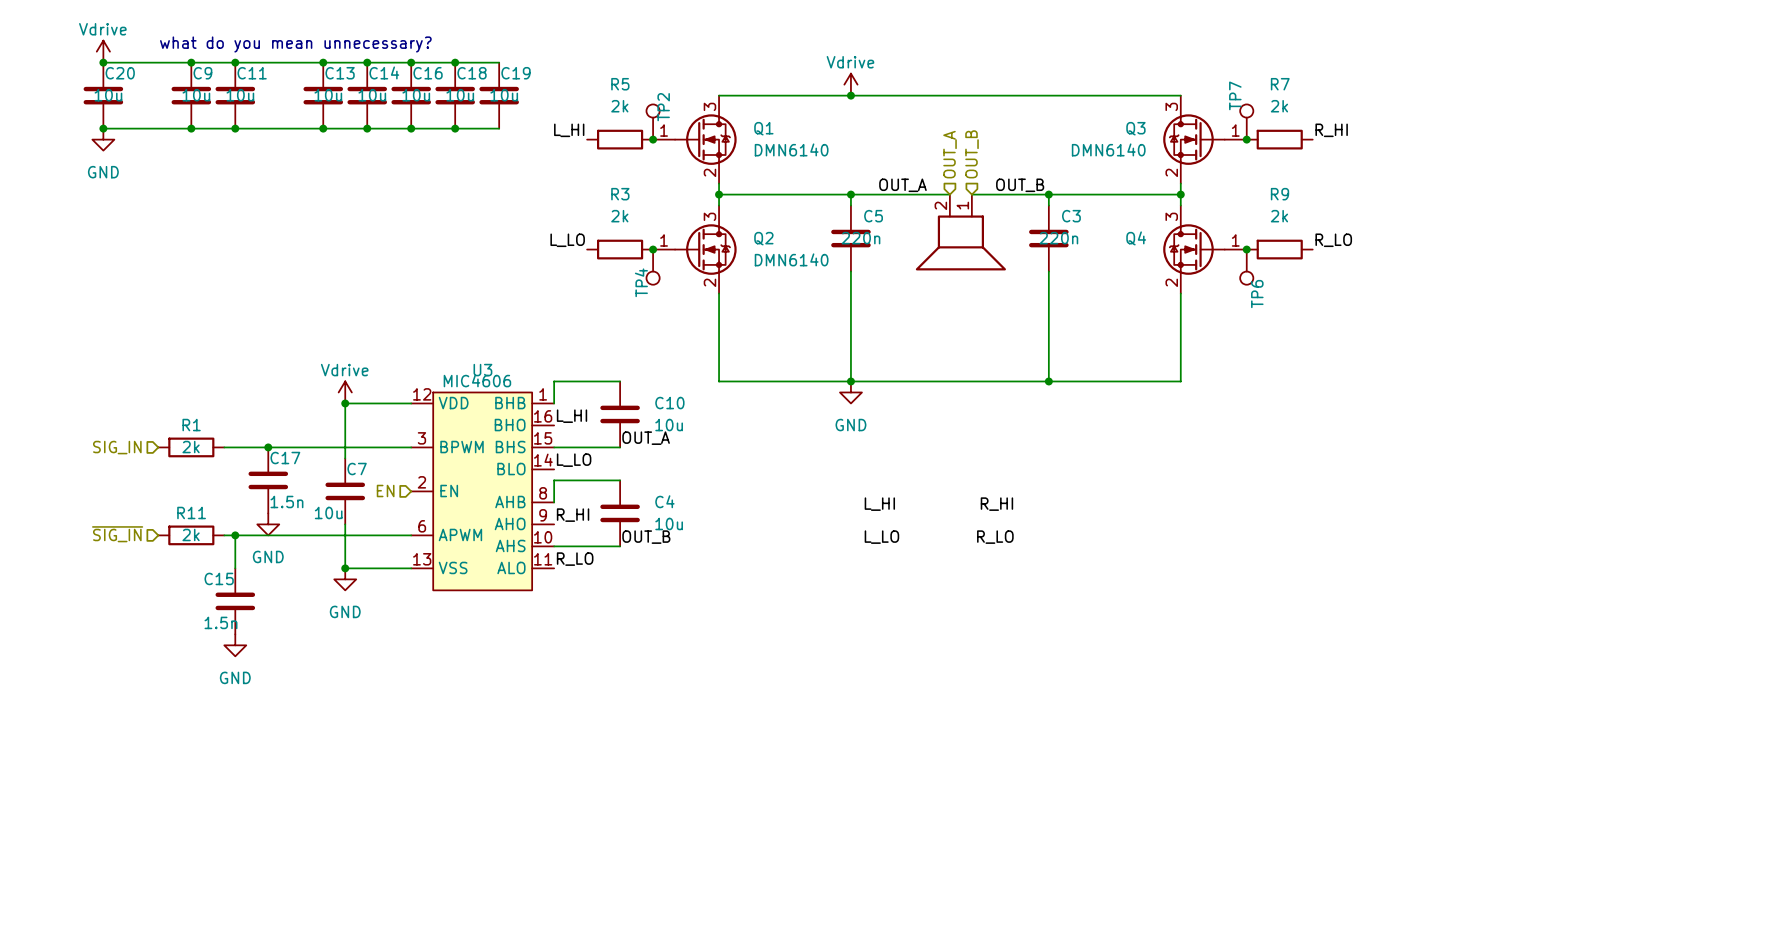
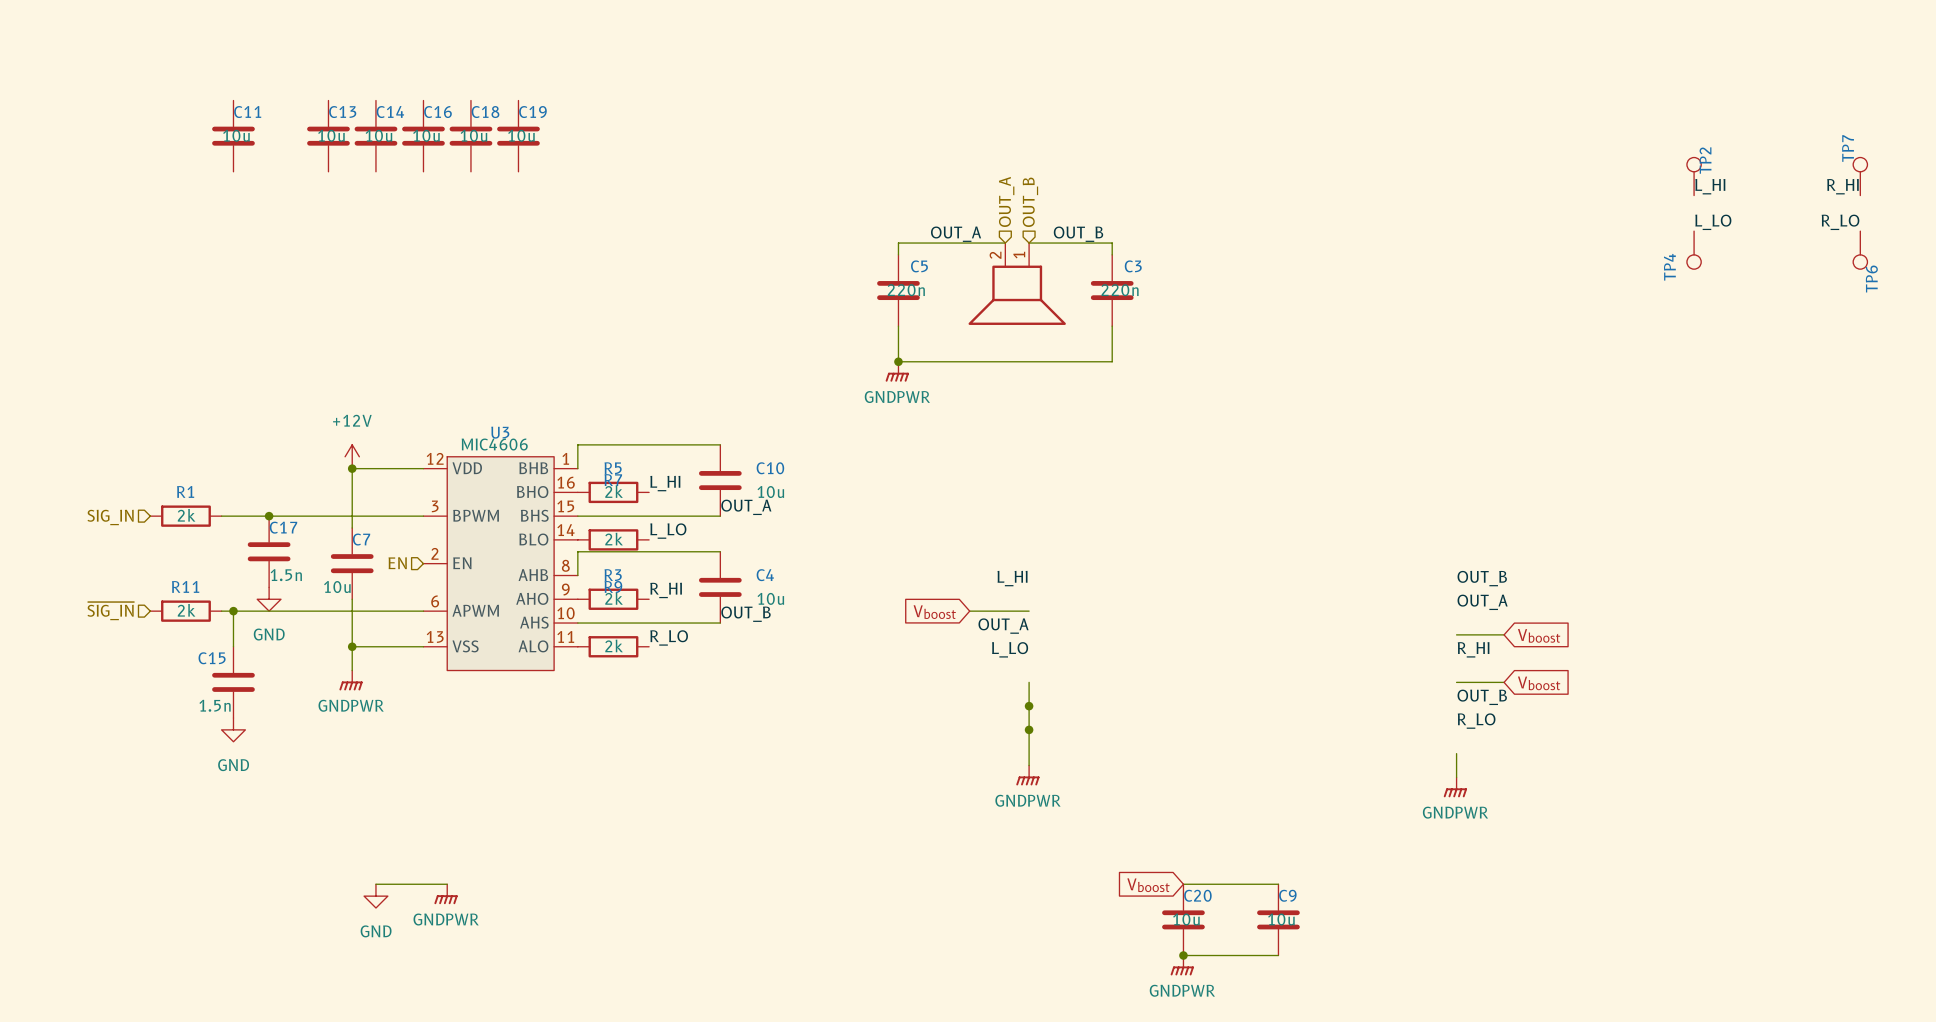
text: what do you mean unnecessary? (295, 44) -> none
power symbol: Vdrive (103, 51) -> none
wire: (103, 62) (499, 62) -> none
junction: (103, 62) -> none
junction: (191, 62) -> none
junction: (235, 62) -> none
junction: (323, 62) -> none
junction: (367, 62) -> none
junction: (411, 62) -> none
junction: (455, 62) -> none
R5 name position: R5 (620, 84) -> R5 (613, 468)
power symbol: Vdrive (850, 84) -> none
C20 position: (103, 95) -> (1183, 919)
C9 position: (191, 95) -> (1278, 919)
wire: (719, 95) (1180, 95) -> none
junction: (850, 95) -> none
R5 value position: 2k (619, 106) -> 2k (614, 491)
R7 value position: 2k (1279, 106) -> 2k (614, 539)
TP2 position: (653, 122) -> (1694, 176)
TP7 position: (1246, 122) -> (1860, 176)
wire: (103, 128) (499, 128) -> none
junction: (103, 128) -> none
junction: (191, 128) -> none
junction: (235, 128) -> none
junction: (323, 128) -> none
junction: (367, 128) -> none
junction: (411, 128) -> none
junction: (455, 128) -> none
label: L_HI (569, 130) -> none
label: R_HI (1331, 130) -> none
power symbol: GND (103, 139) -> none
R5 position: (620, 139) -> (613, 492)
junction: (653, 139) -> none
Q1: DMN6140 (694, 139) -> none
Q3: DMN6140 (1204, 139) -> none
junction: (1246, 139) -> none
R7 position: (1279, 139) -> (613, 539)
label: none -> L_HI (1710, 186)
label: none -> R_HI (1842, 186)
label: none -> L_LO (1713, 222)
label: none -> R_LO (1840, 222)
wire: (719, 183) (719, 205) -> none
wire: (1180, 183) (1180, 205) -> none
R3 name position: R3 (620, 194) -> R3 (613, 575)
wire: (719, 194) (850, 194) -> none
junction: (719, 194) -> none
junction: (850, 194) -> none
wire: (1048, 194) (1180, 194) -> none
junction: (1048, 194) -> none
junction: (1180, 194) -> none
R3 value position: 2k (619, 216) -> 2k (614, 598)
R9 value position: 2k (1279, 216) -> 2k (614, 645)
label: L_LO (567, 240) -> none
label: R_LO (1333, 240) -> none
R3 position: (620, 249) -> (613, 599)
junction: (653, 249) -> none
Q2: DMN6140 (694, 249) -> none
Q4: (1204, 249) -> none
junction: (1246, 249) -> none
R9 position: (1279, 249) -> (613, 646)
TP4 position: (653, 267) -> (1694, 250)
TP6 position: (1246, 267) -> (1860, 250)
TP4 name position: TP4 (641, 282) -> TP4 (1669, 267)
wire: (719, 293) (719, 381) (1180, 381) (1180, 293) -> none
wire: (850, 304) (850, 381) -> (898, 361) (1112, 361)
junction: none -> (898, 361)
wire: (1048, 304) (1048, 381) -> none
power symbol: none -> GNDPWR (897, 371)
wire: none -> (649, 444) (720, 444)
junction: (850, 381) -> none
junction: (1048, 381) -> none
power symbol: Vdrive (345, 392) -> +12V (352, 456)
power symbol: GND (850, 392) -> none
C10 position: (620, 414) -> (720, 480)
label position: L_HI (572, 416) -> L_HI (665, 483)
label position: OUT_A (646, 438) -> OUT_A (746, 507)
wire: none -> (649, 516) (720, 516)
label position: L_LO (574, 460) -> L_LO (668, 531)
wire: none -> (649, 551) (720, 551)
label position: L_HI (879, 504) -> L_HI (1012, 578)
label: R_HI (996, 504) -> none
label: none -> OUT_B (1482, 578)
C4 position: (620, 513) -> (720, 587)
label position: R_HI (573, 515) -> R_HI (666, 590)
label: none -> OUT_A (1482, 602)
wire: none -> (969, 611) (1029, 611)
global label: none -> Vboost (934, 612)
label position: OUT_B (646, 537) -> OUT_B (745, 614)
label position: L_LO (881, 537) -> L_LO (1010, 649)
label: R_LO (995, 537) -> none
wire: none -> (649, 623) (720, 623)
label: none -> OUT_A (1003, 626)
wire: none -> (1456, 634) (1504, 634)
global label: none -> Vboost (1539, 635)
label position: R_LO (575, 559) -> R_LO (669, 637)
label: none -> R_HI (1473, 649)
power symbol: GND (345, 579) -> none
power symbol: none -> GNDPWR (351, 680)
wire: none -> (1029, 682) (1029, 765)
wire: none -> (1456, 682) (1504, 682)
global label: none -> Vboost (1539, 683)
label: none -> OUT_B (1482, 697)
junction: none -> (1029, 706)
label: none -> R_LO (1476, 721)
junction: none -> (1029, 729)
wire: none -> (1456, 753) (1456, 777)
power symbol: none -> GNDPWR (1027, 775)
power symbol: none -> GNDPWR (1455, 787)
wire: none -> (375, 884) (447, 884)
wire: none -> (1183, 884) (1278, 884)
global label: none -> Vboost (1148, 885)
power symbol: none -> GNDPWR (446, 894)
power symbol: none -> GND (375, 896)
wire: none -> (1183, 955) (1278, 955)
junction: none -> (1183, 955)
power symbol: none -> GNDPWR (1182, 965)

